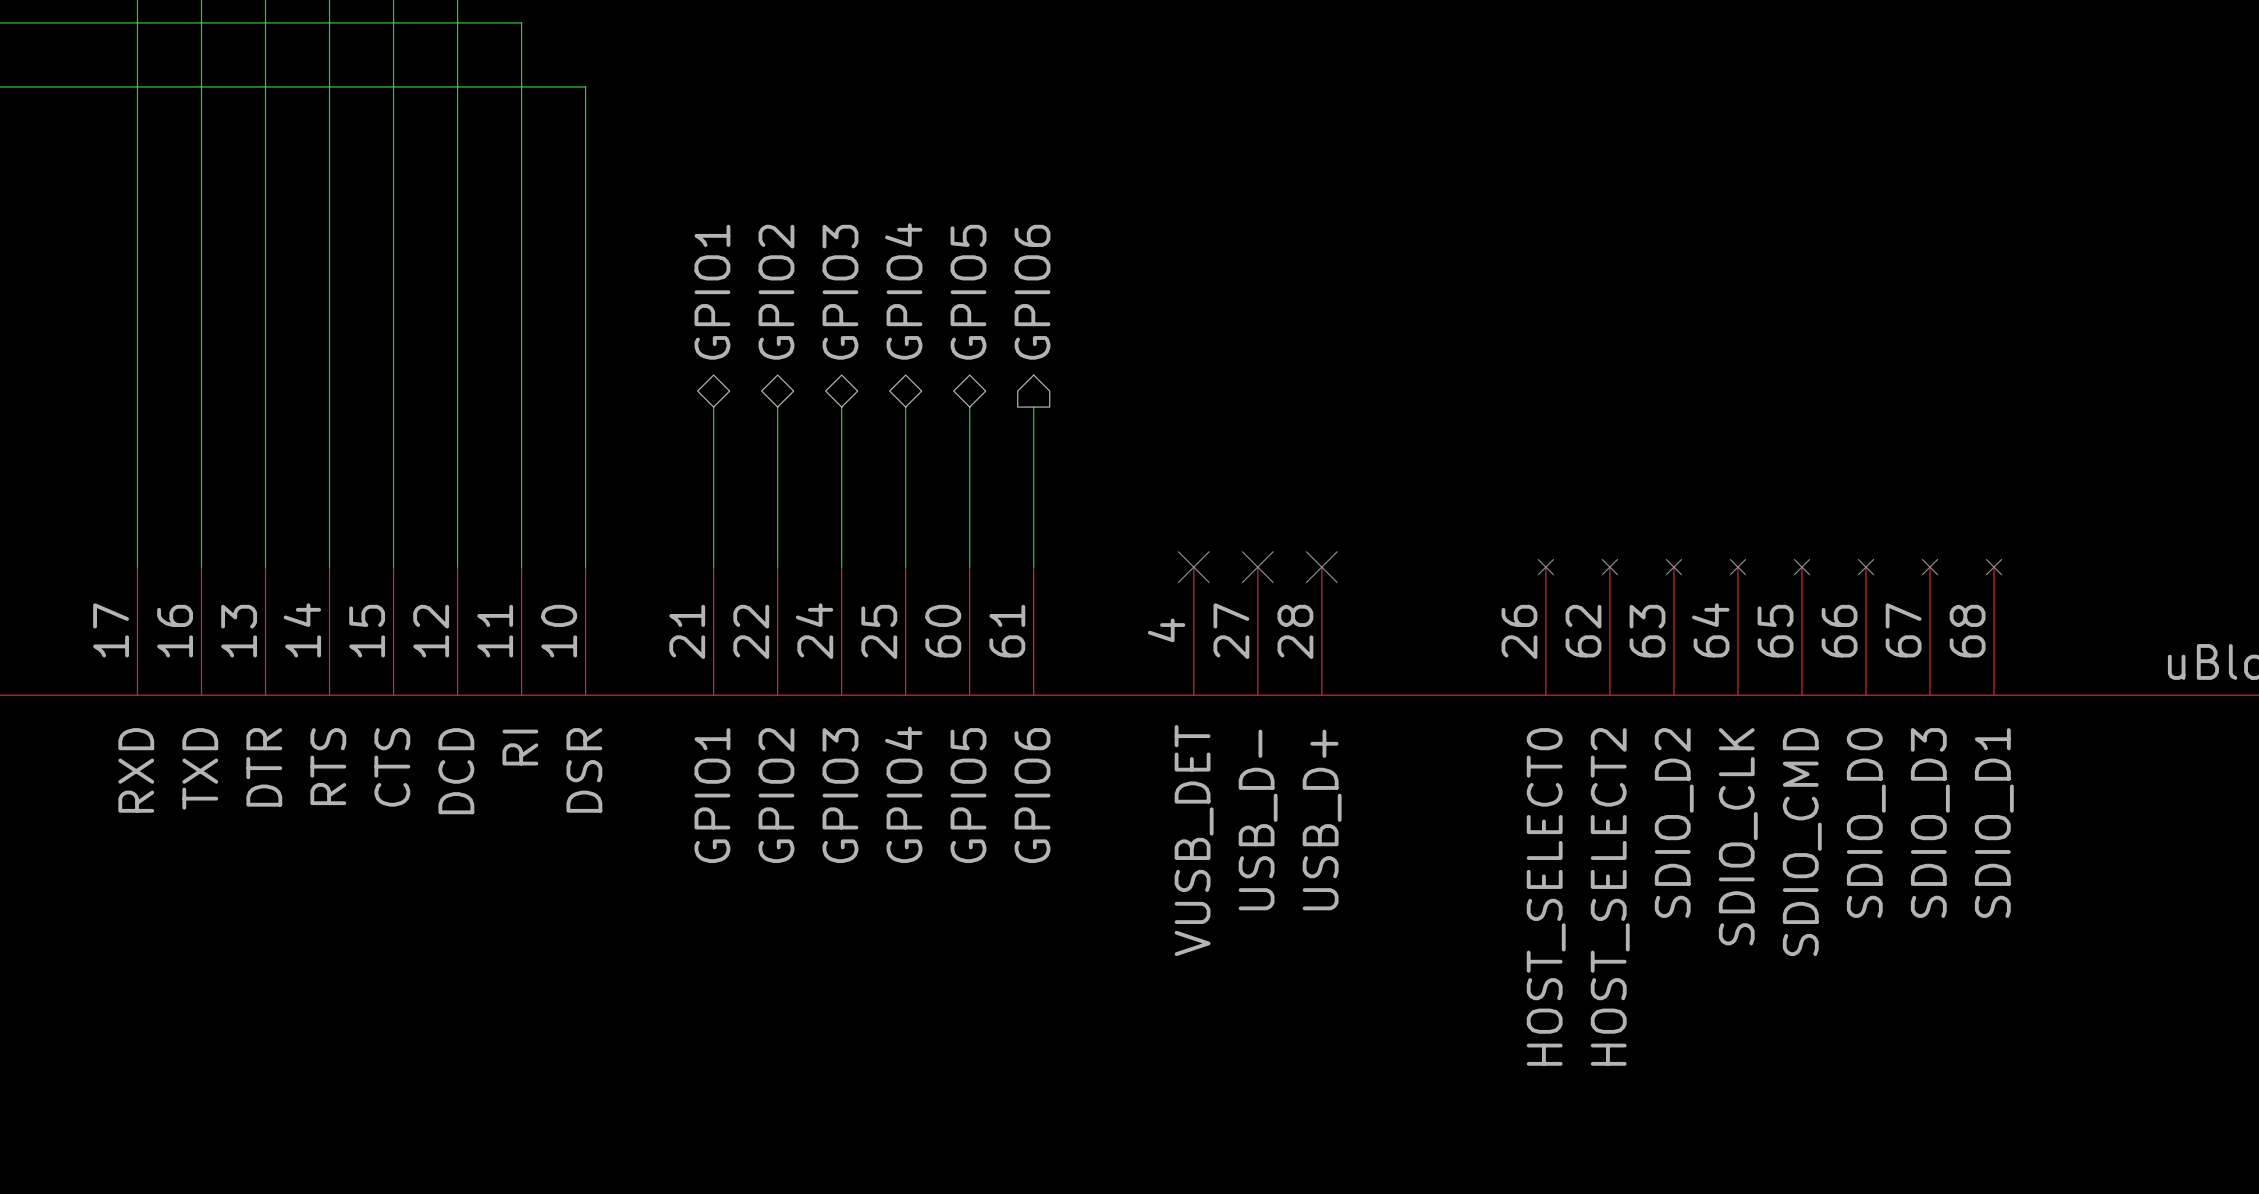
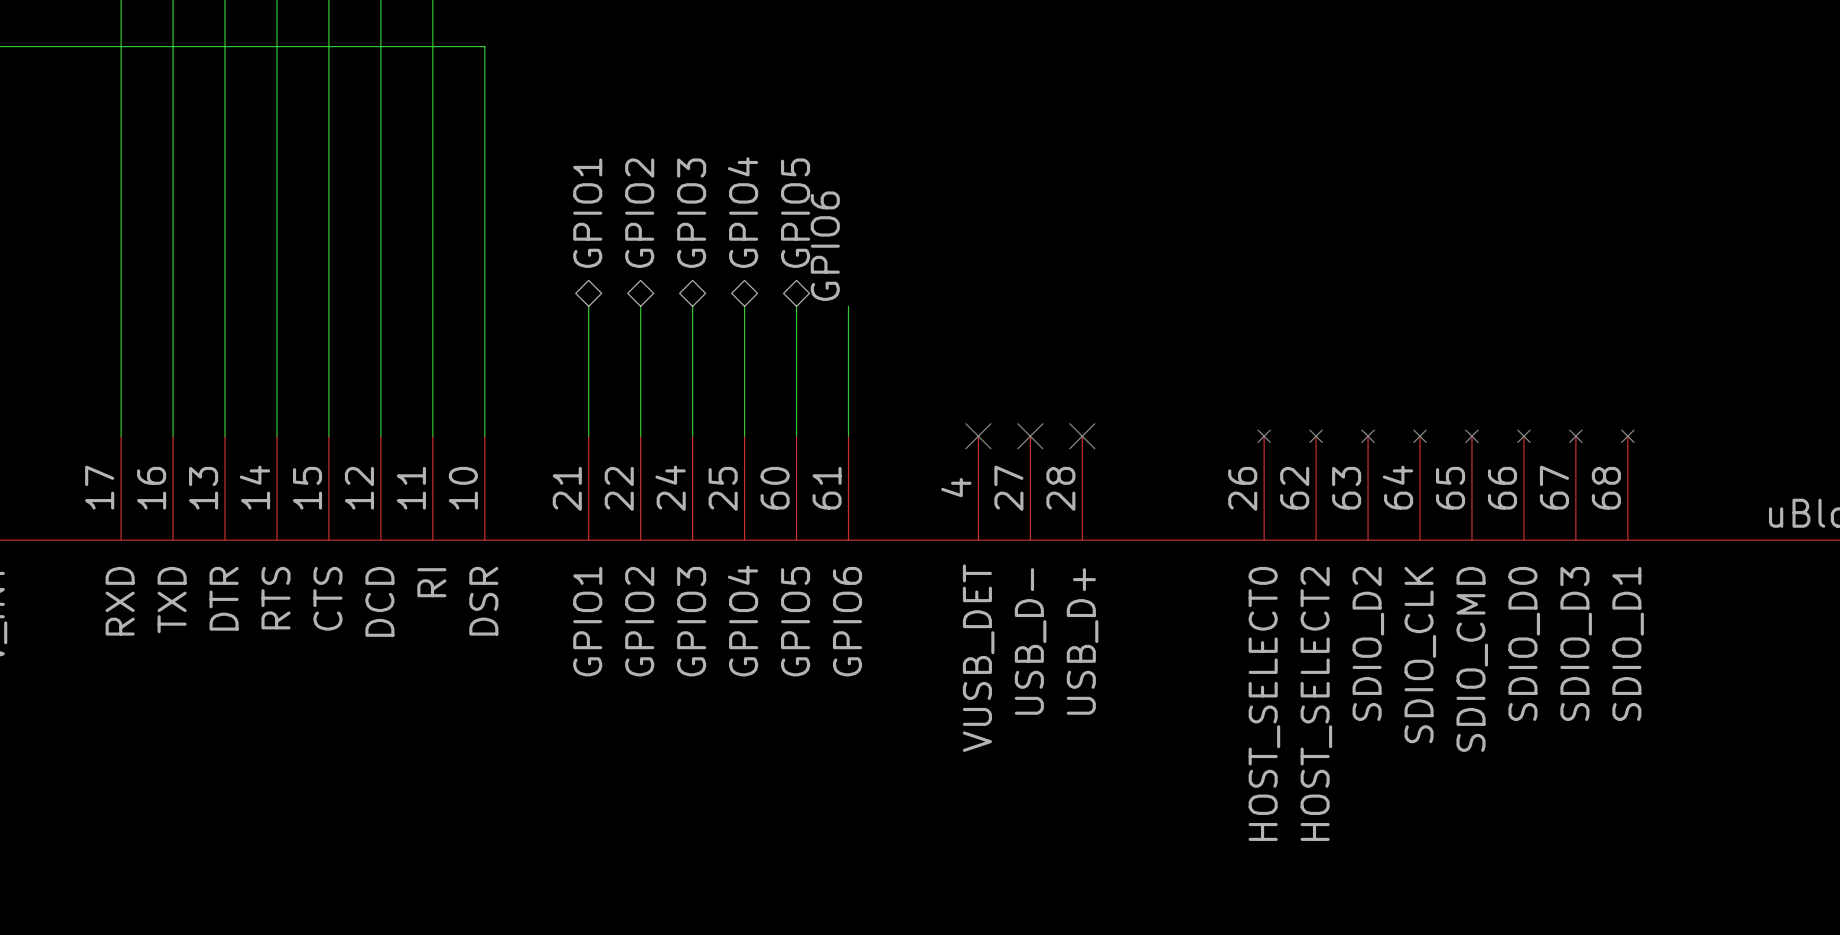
hierarchical label: GPIO6 (1032, 292) -> none
label: none -> GPIO6 (825, 246)

